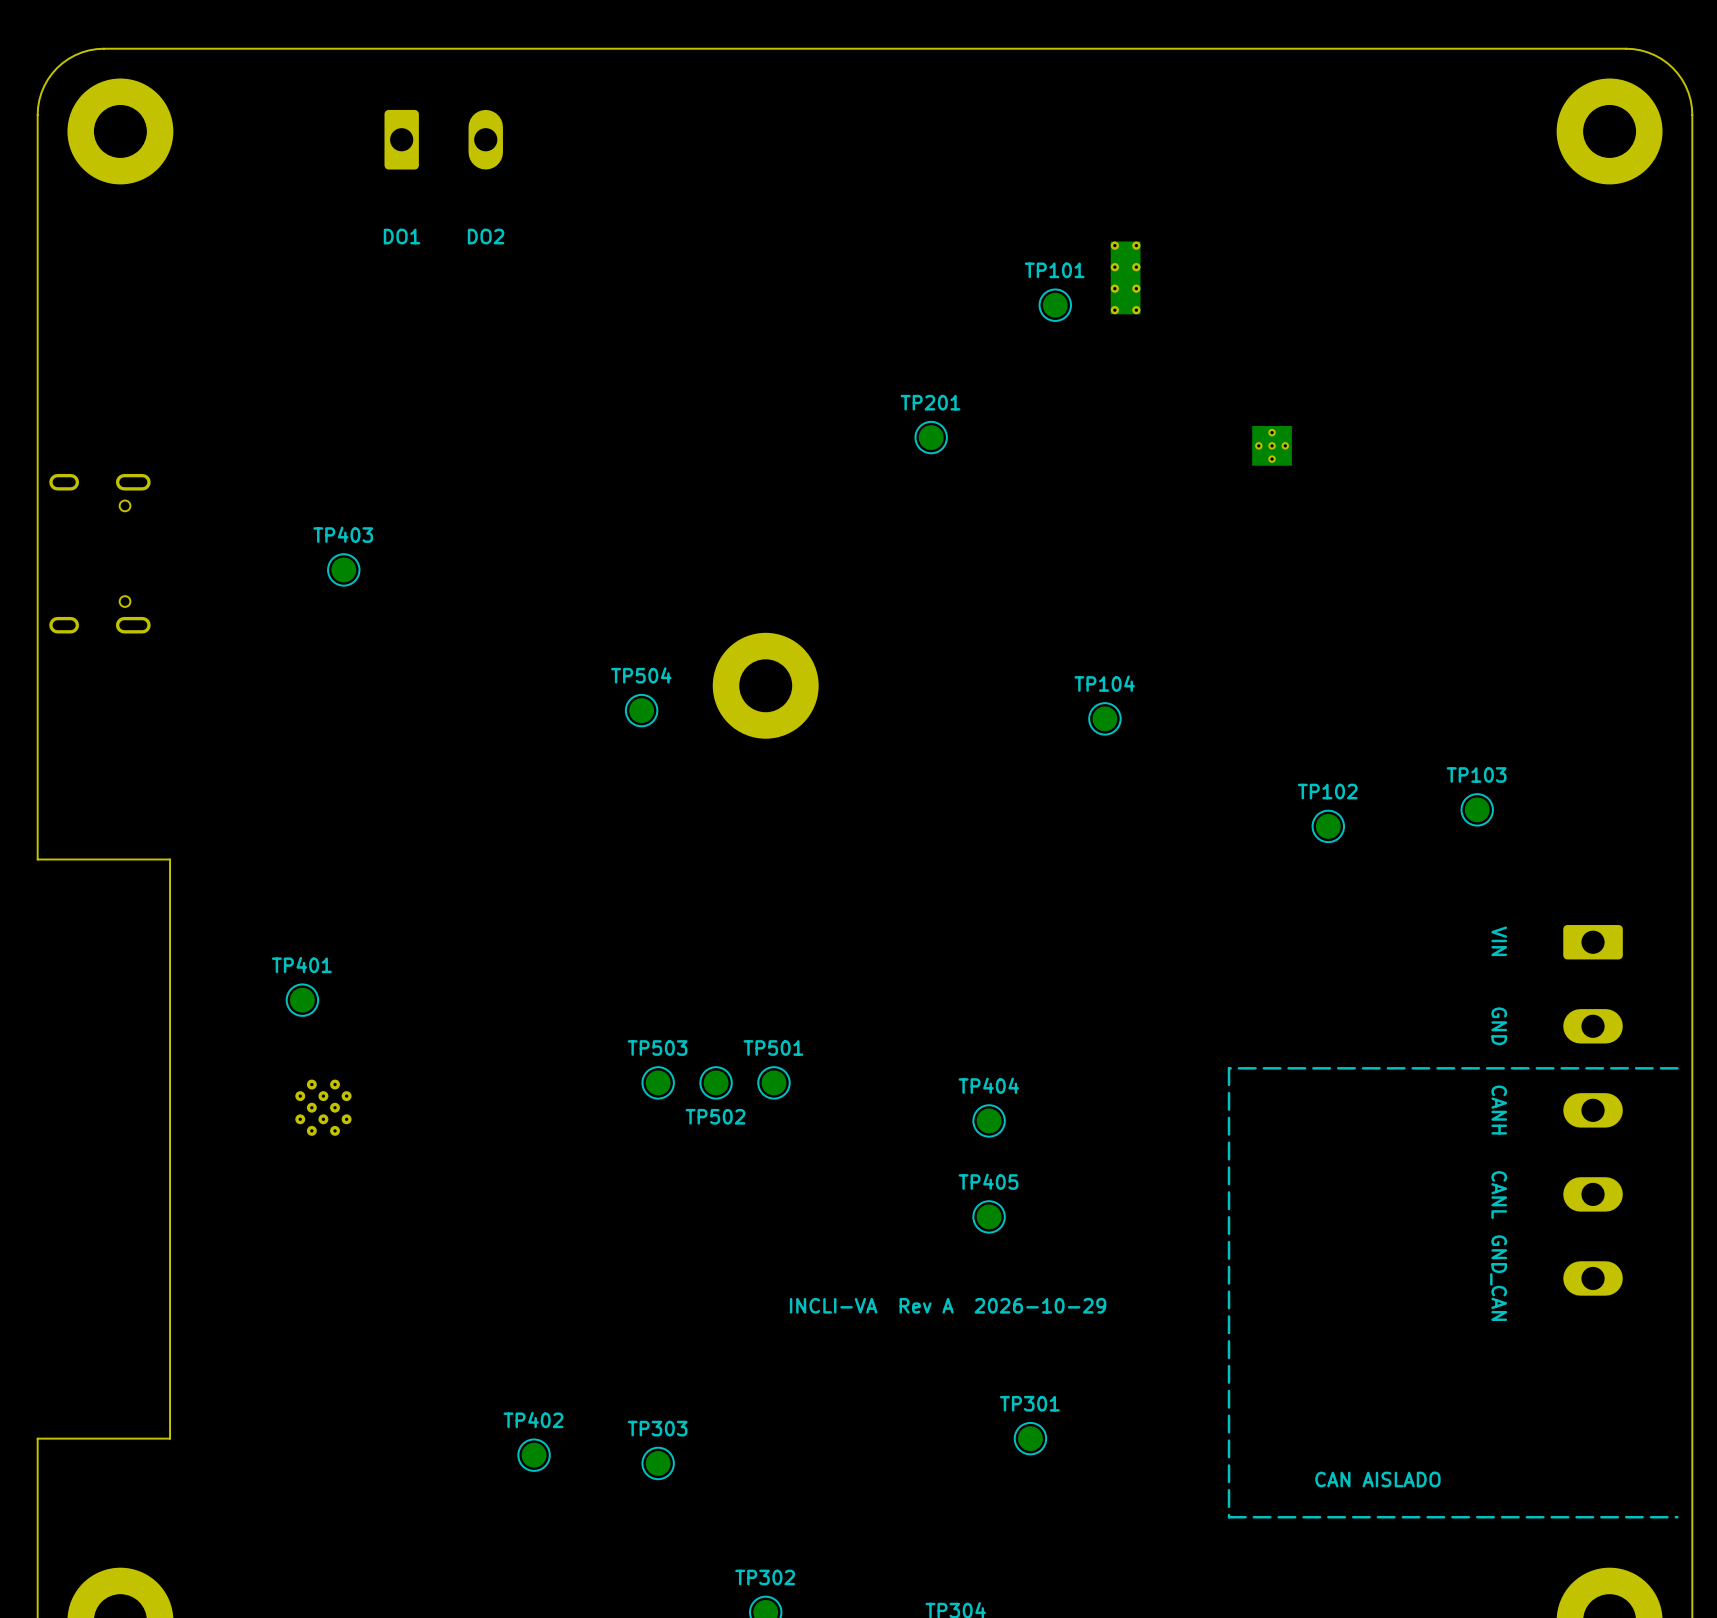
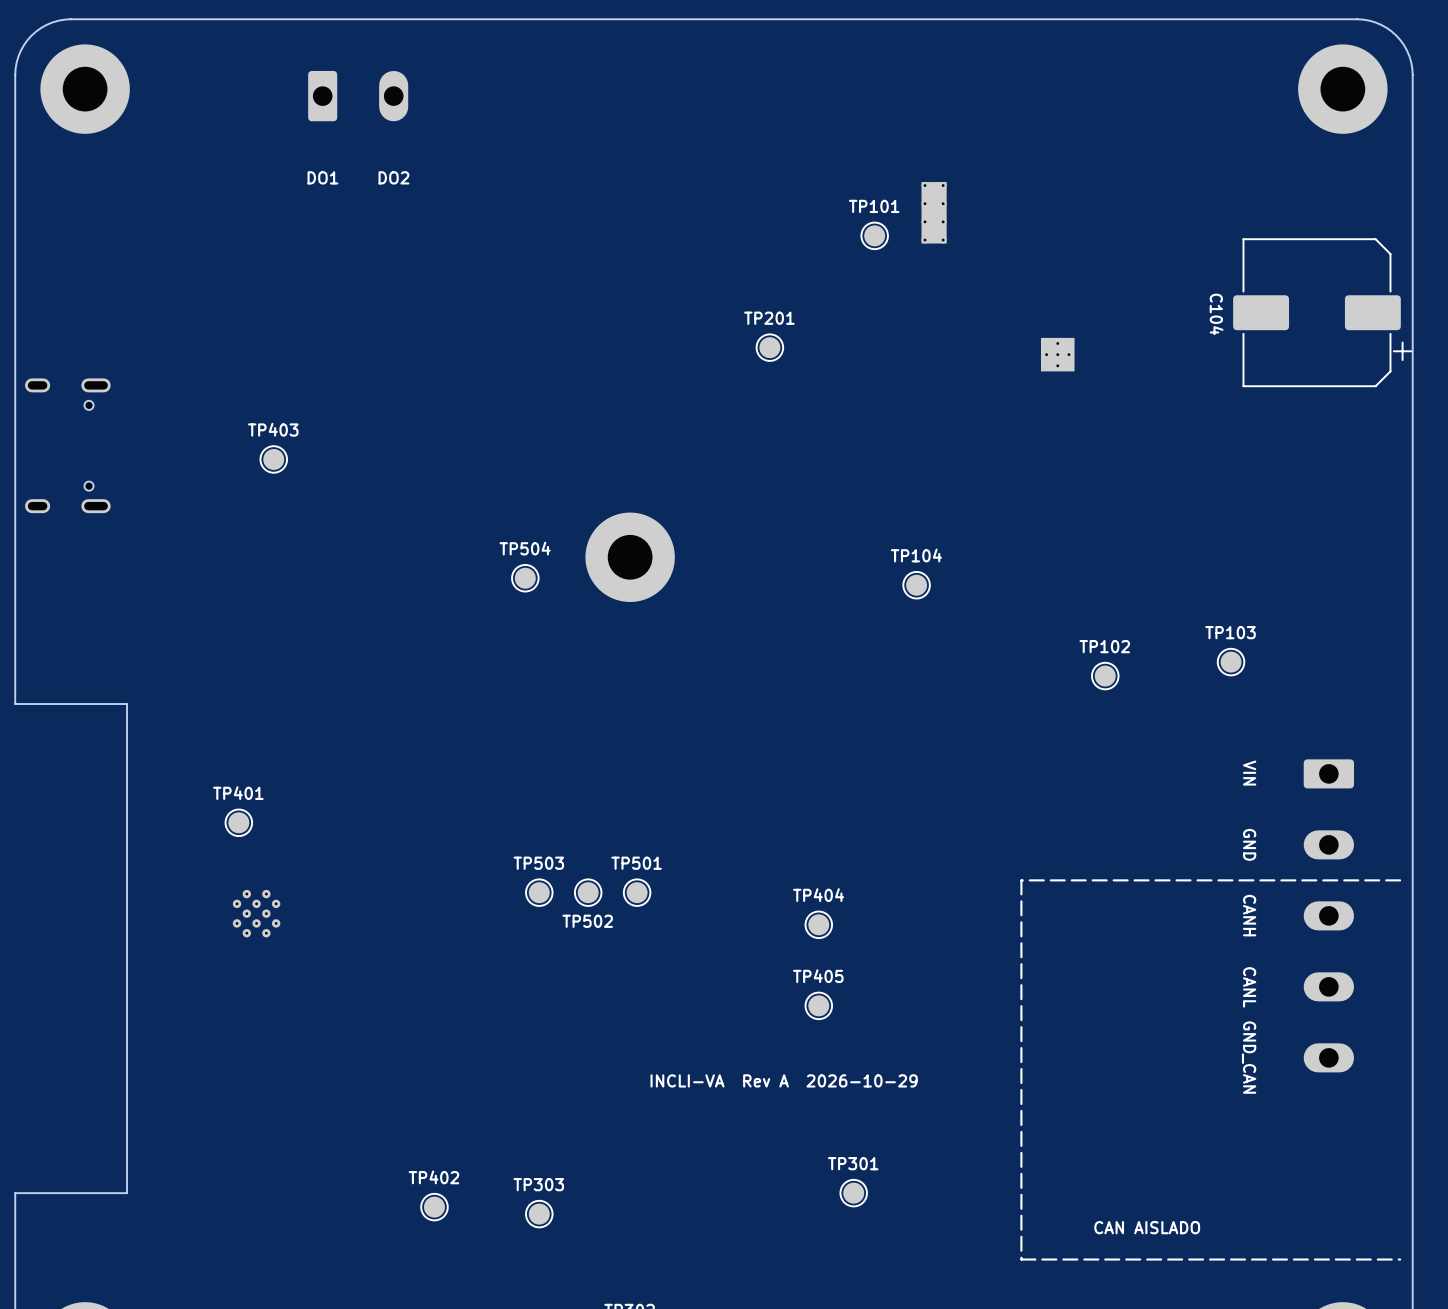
C104: none -> (1322, 312)

